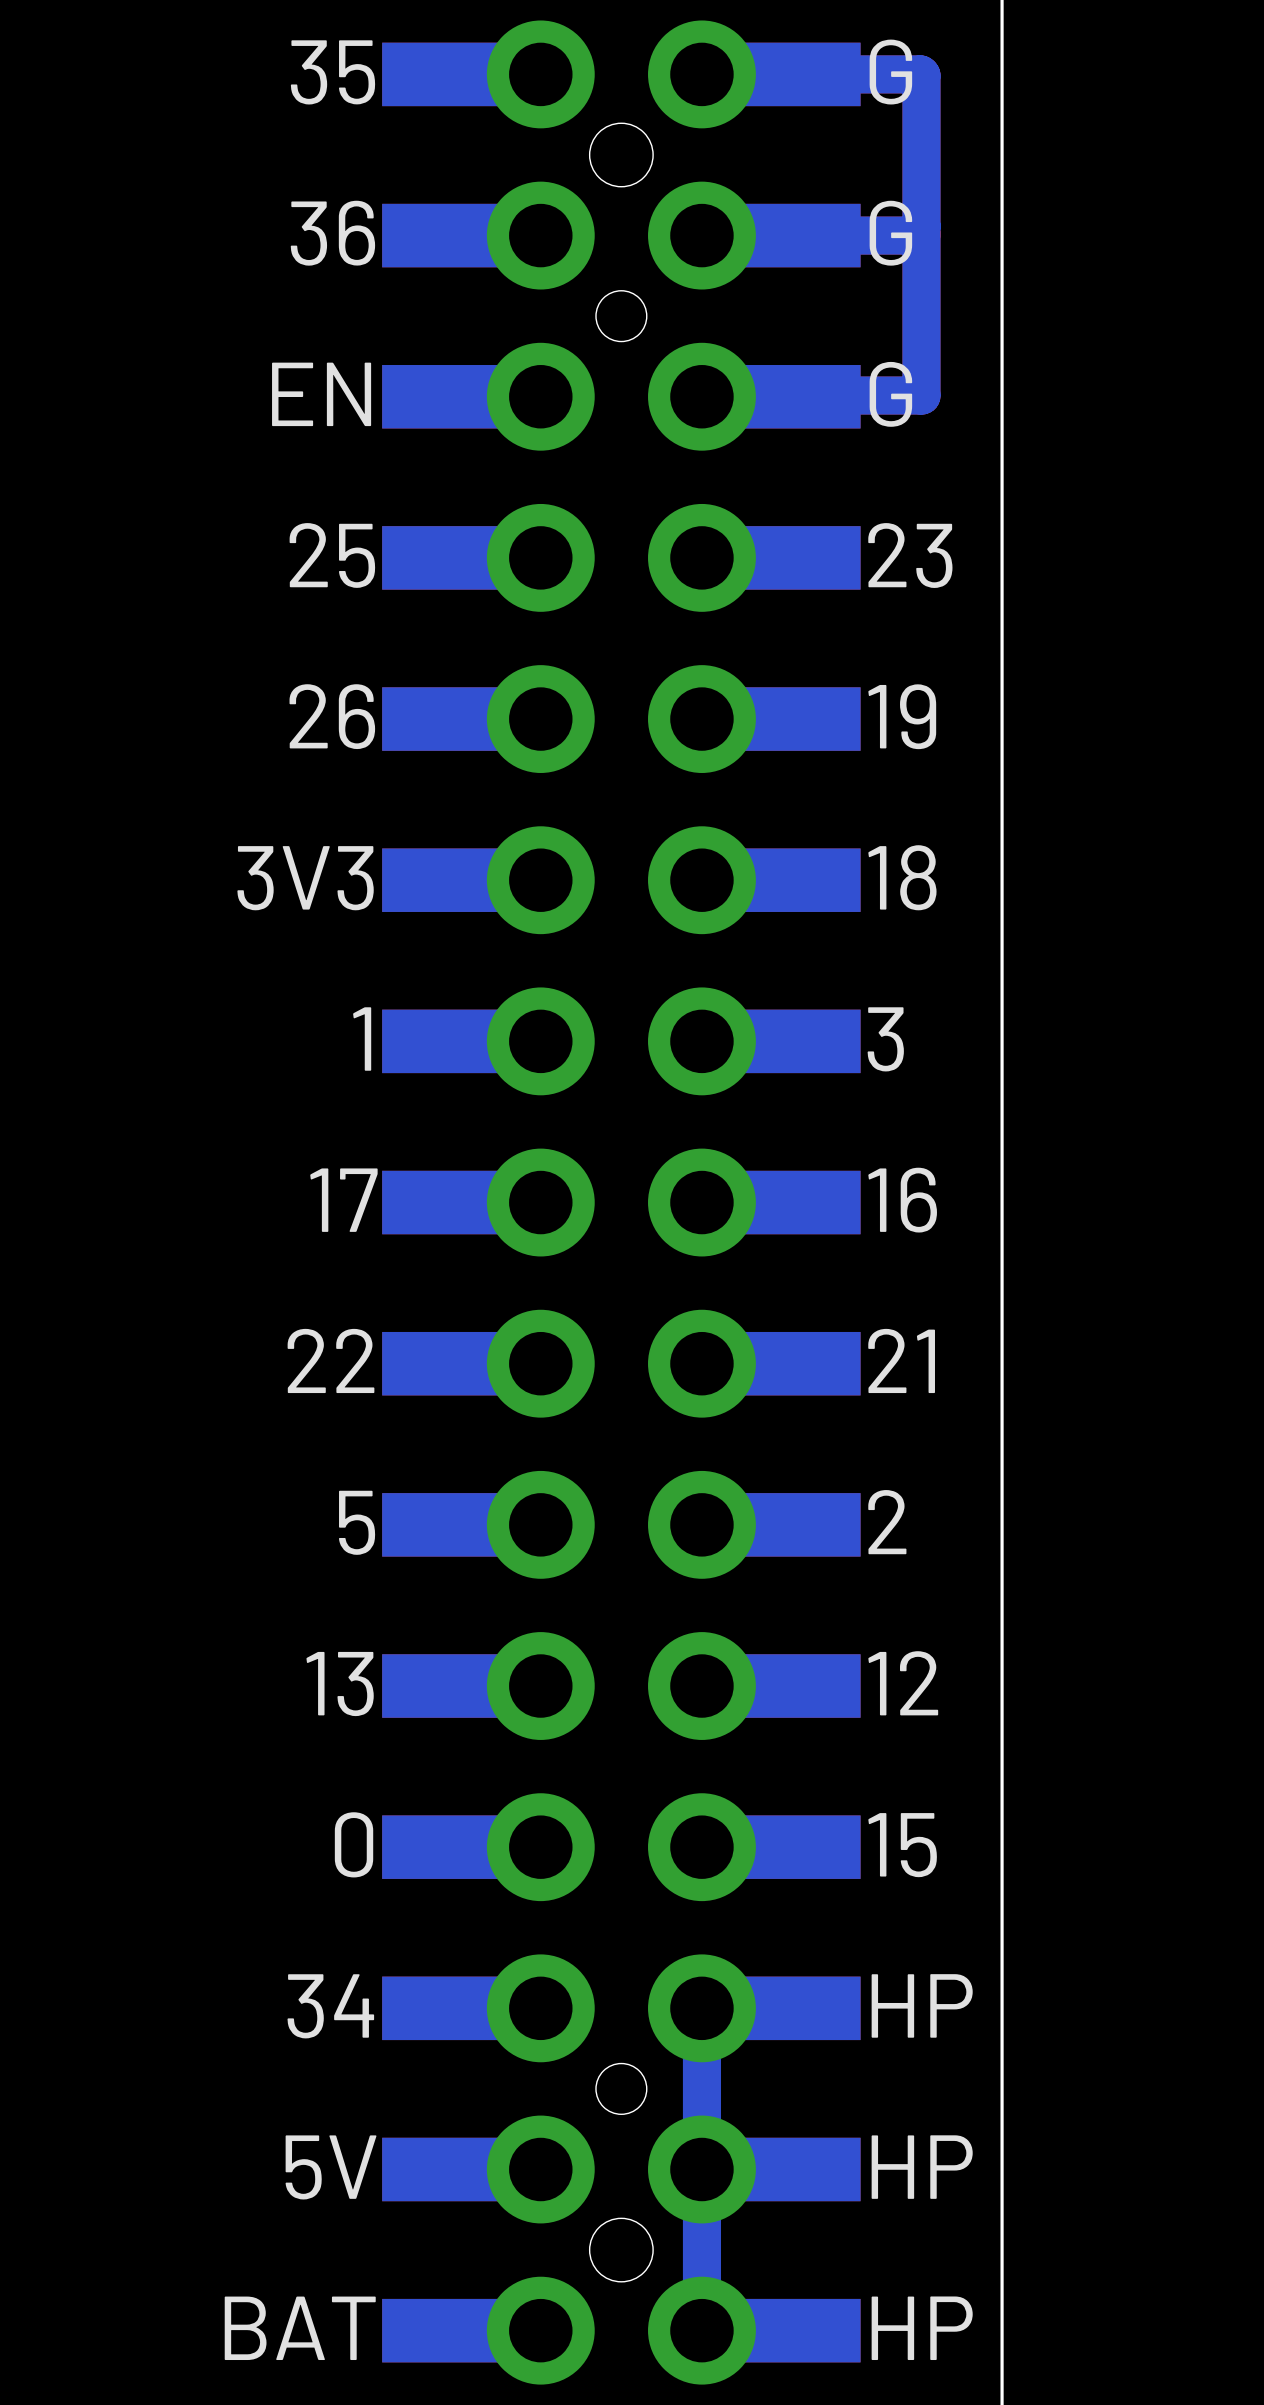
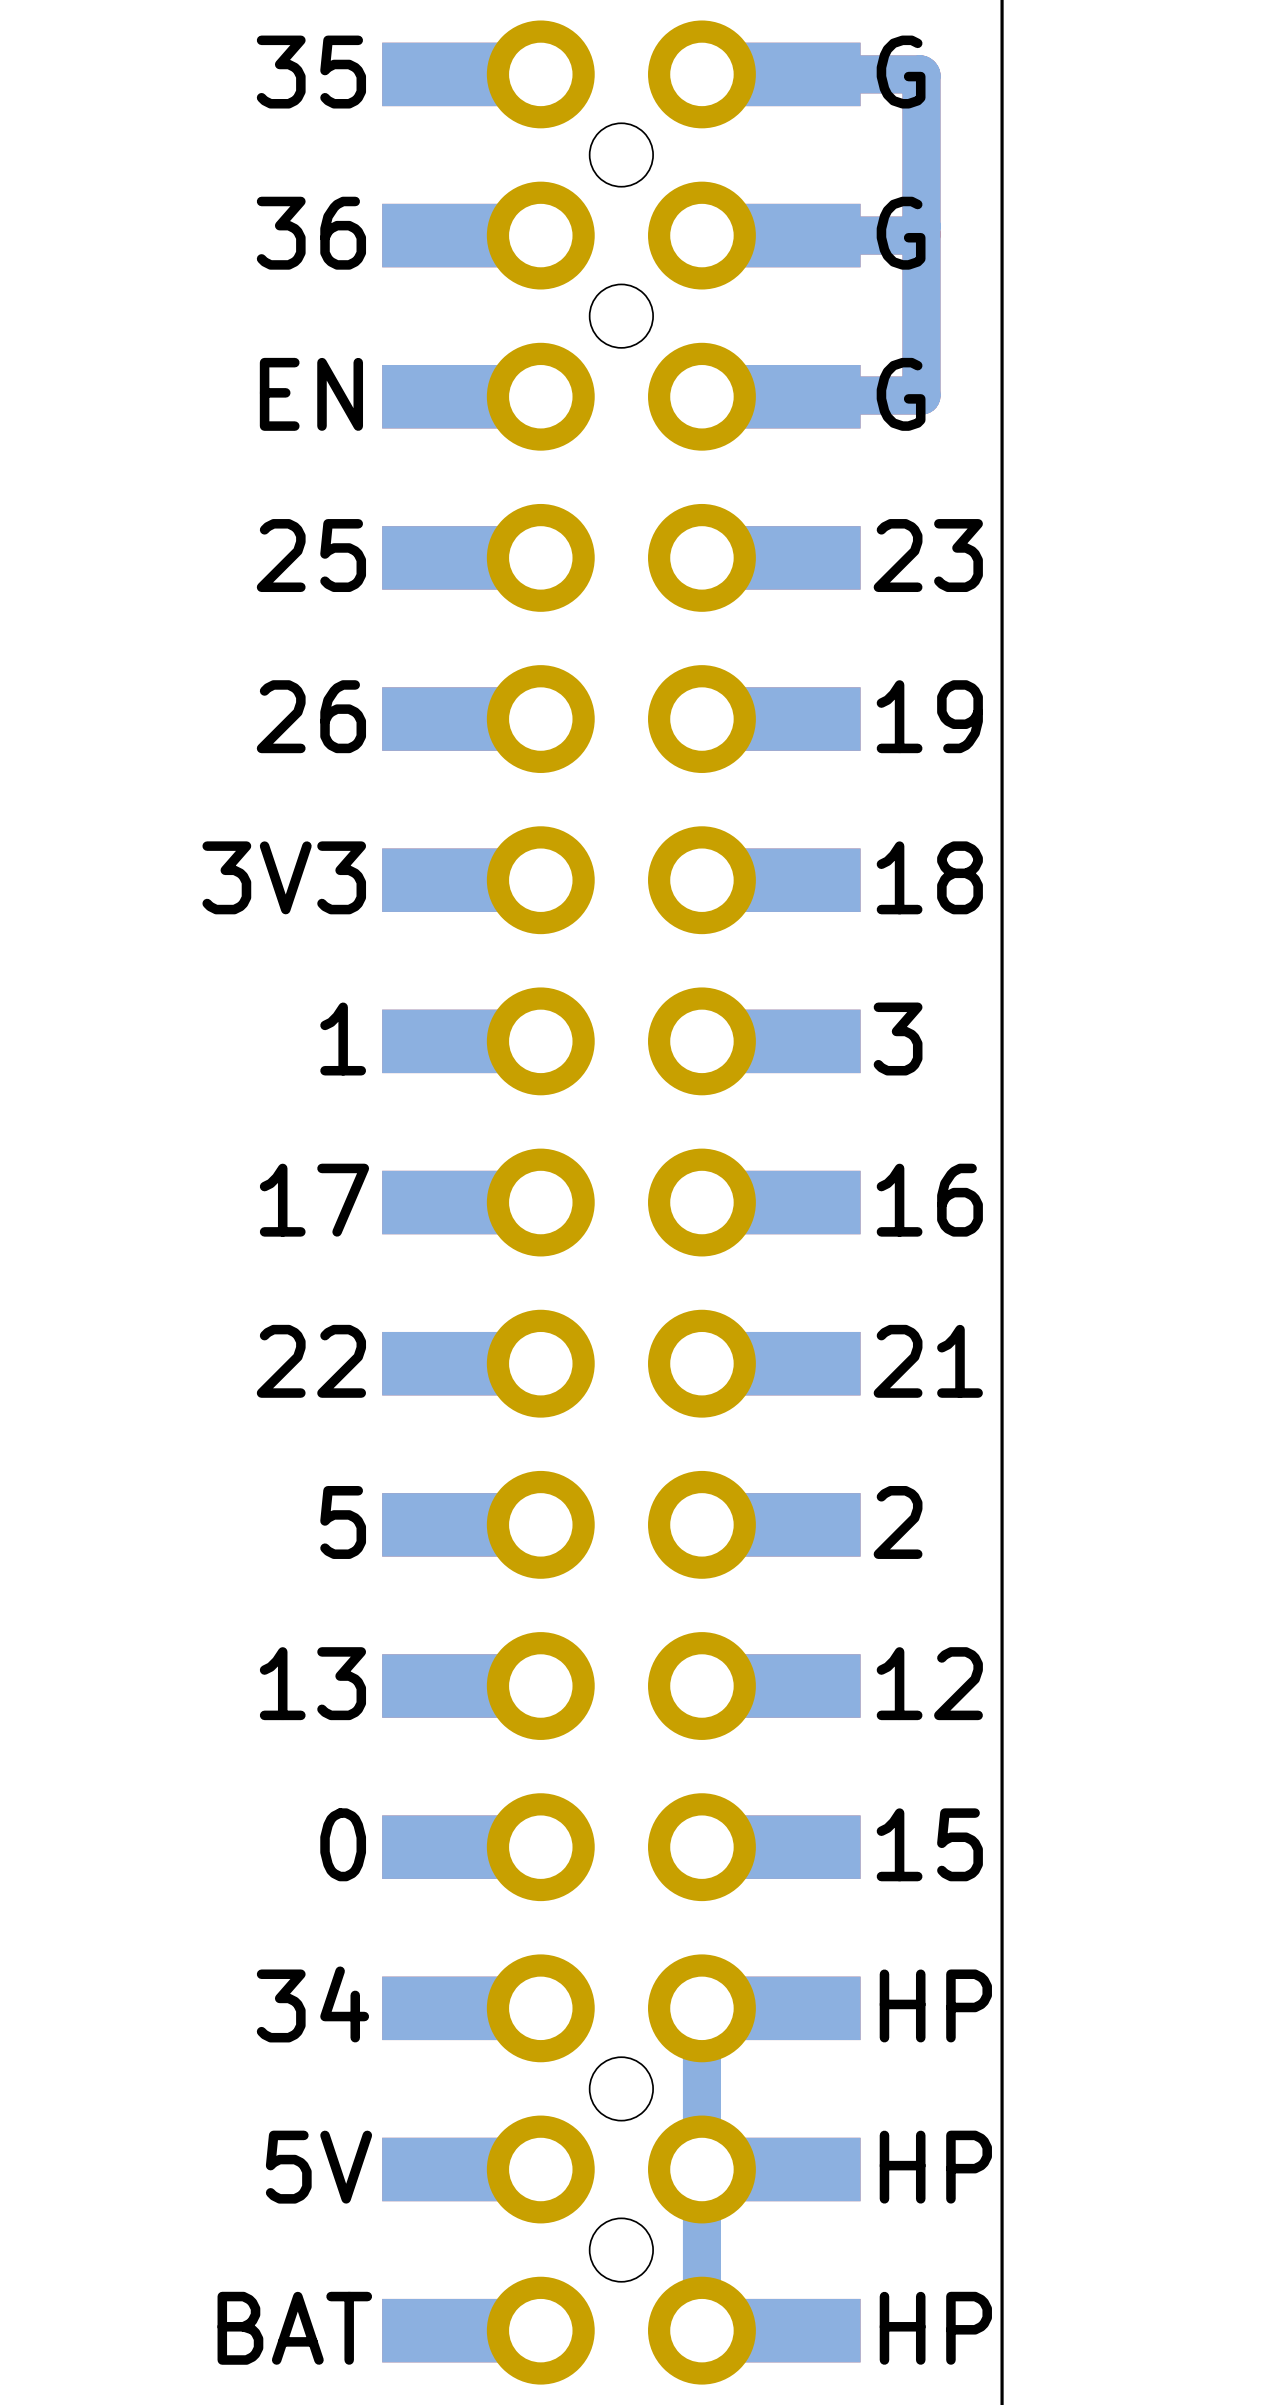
part footprint: [382, 20, 861, 2385] -> [382, 20, 861, 2385]

